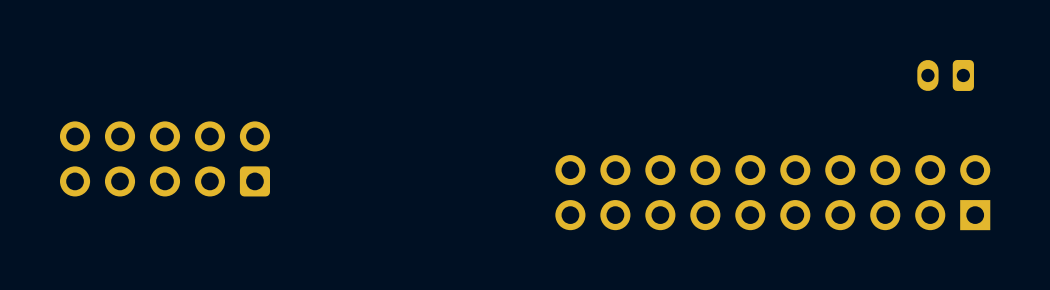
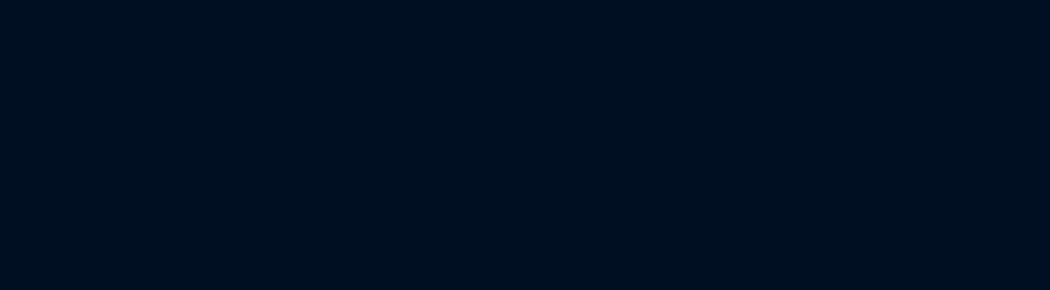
part: (945, 75) -> none
part: (164, 158) -> none
part: (772, 192) -> none

